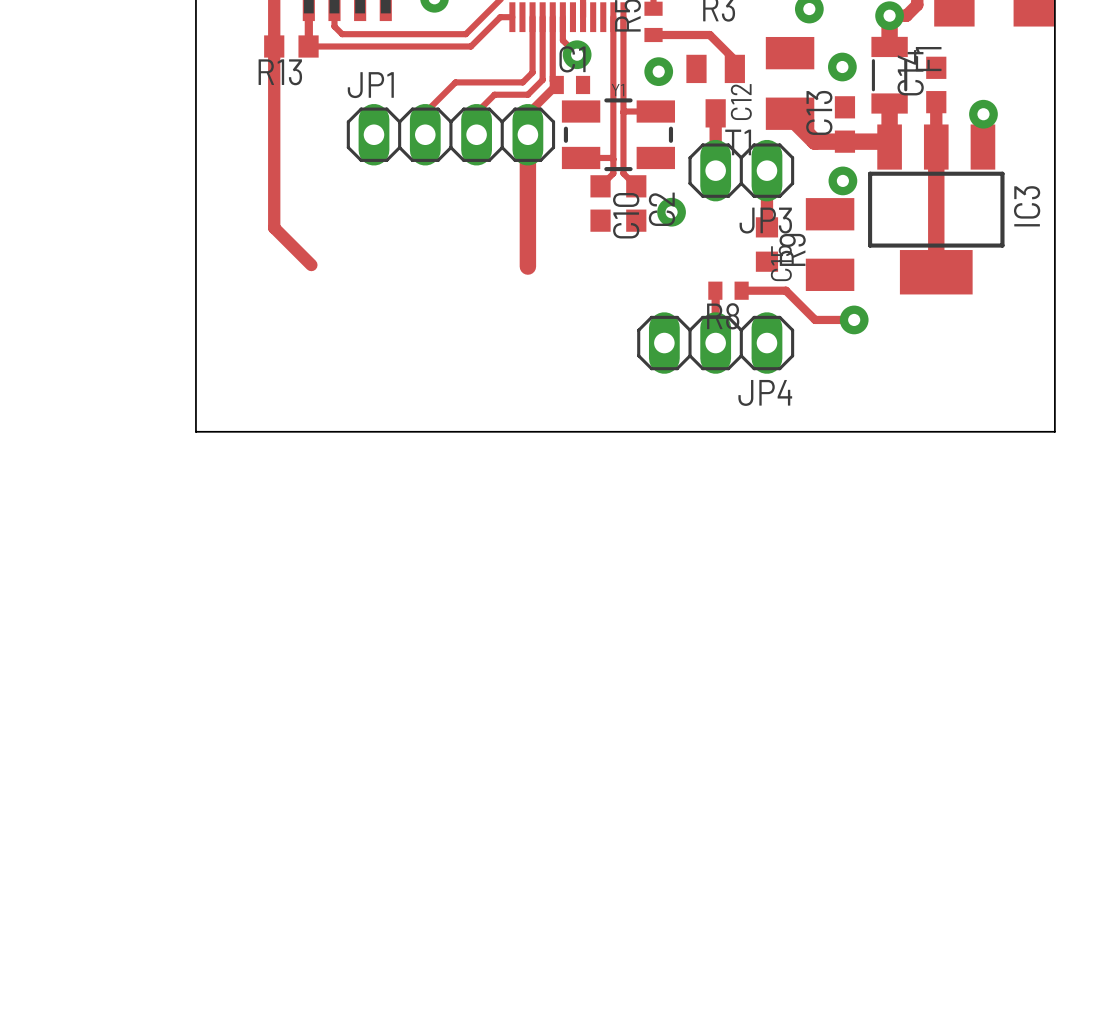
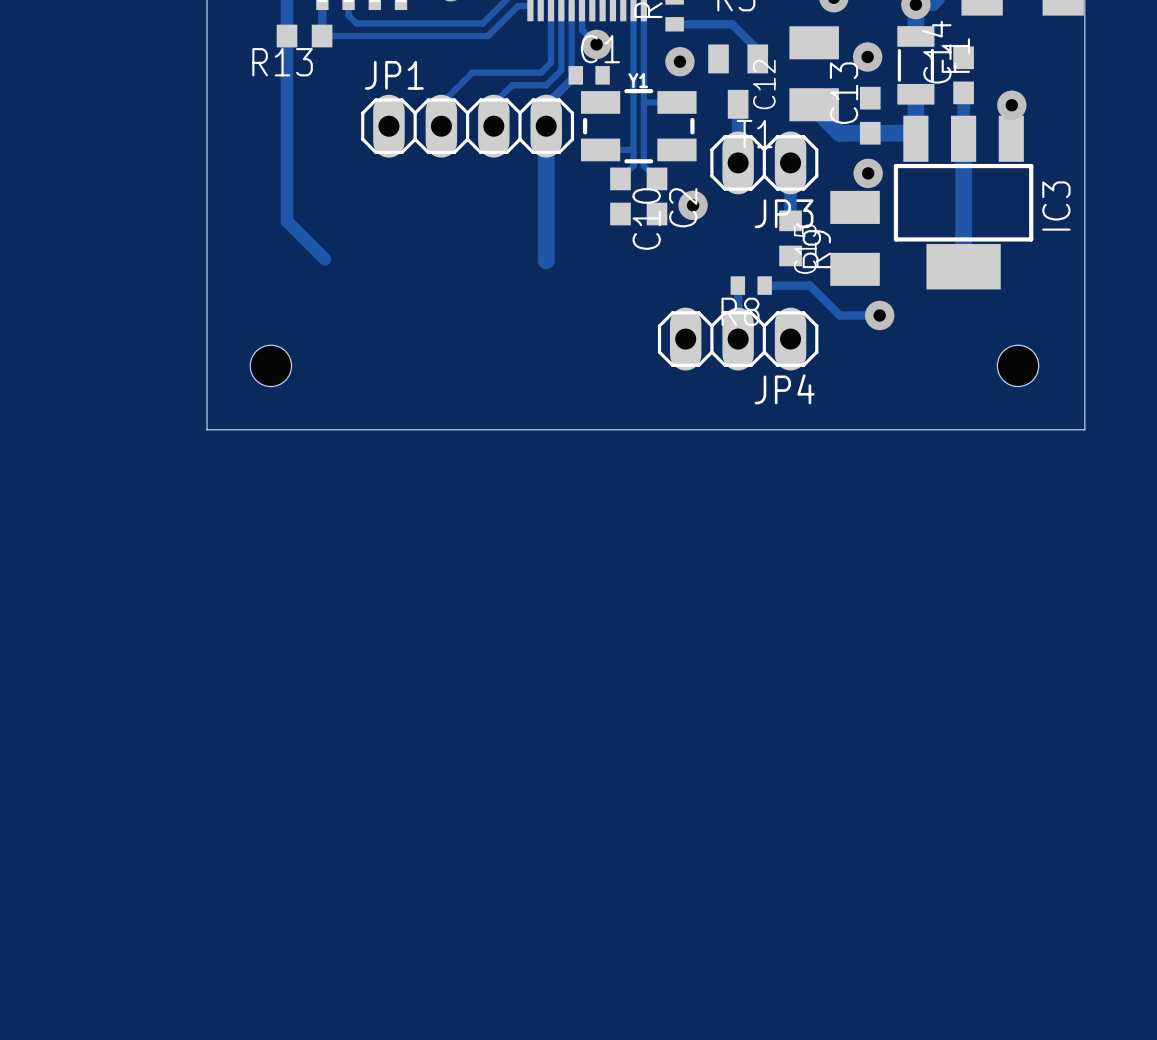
hole: none -> (270, 365)
hole: none -> (1018, 365)

